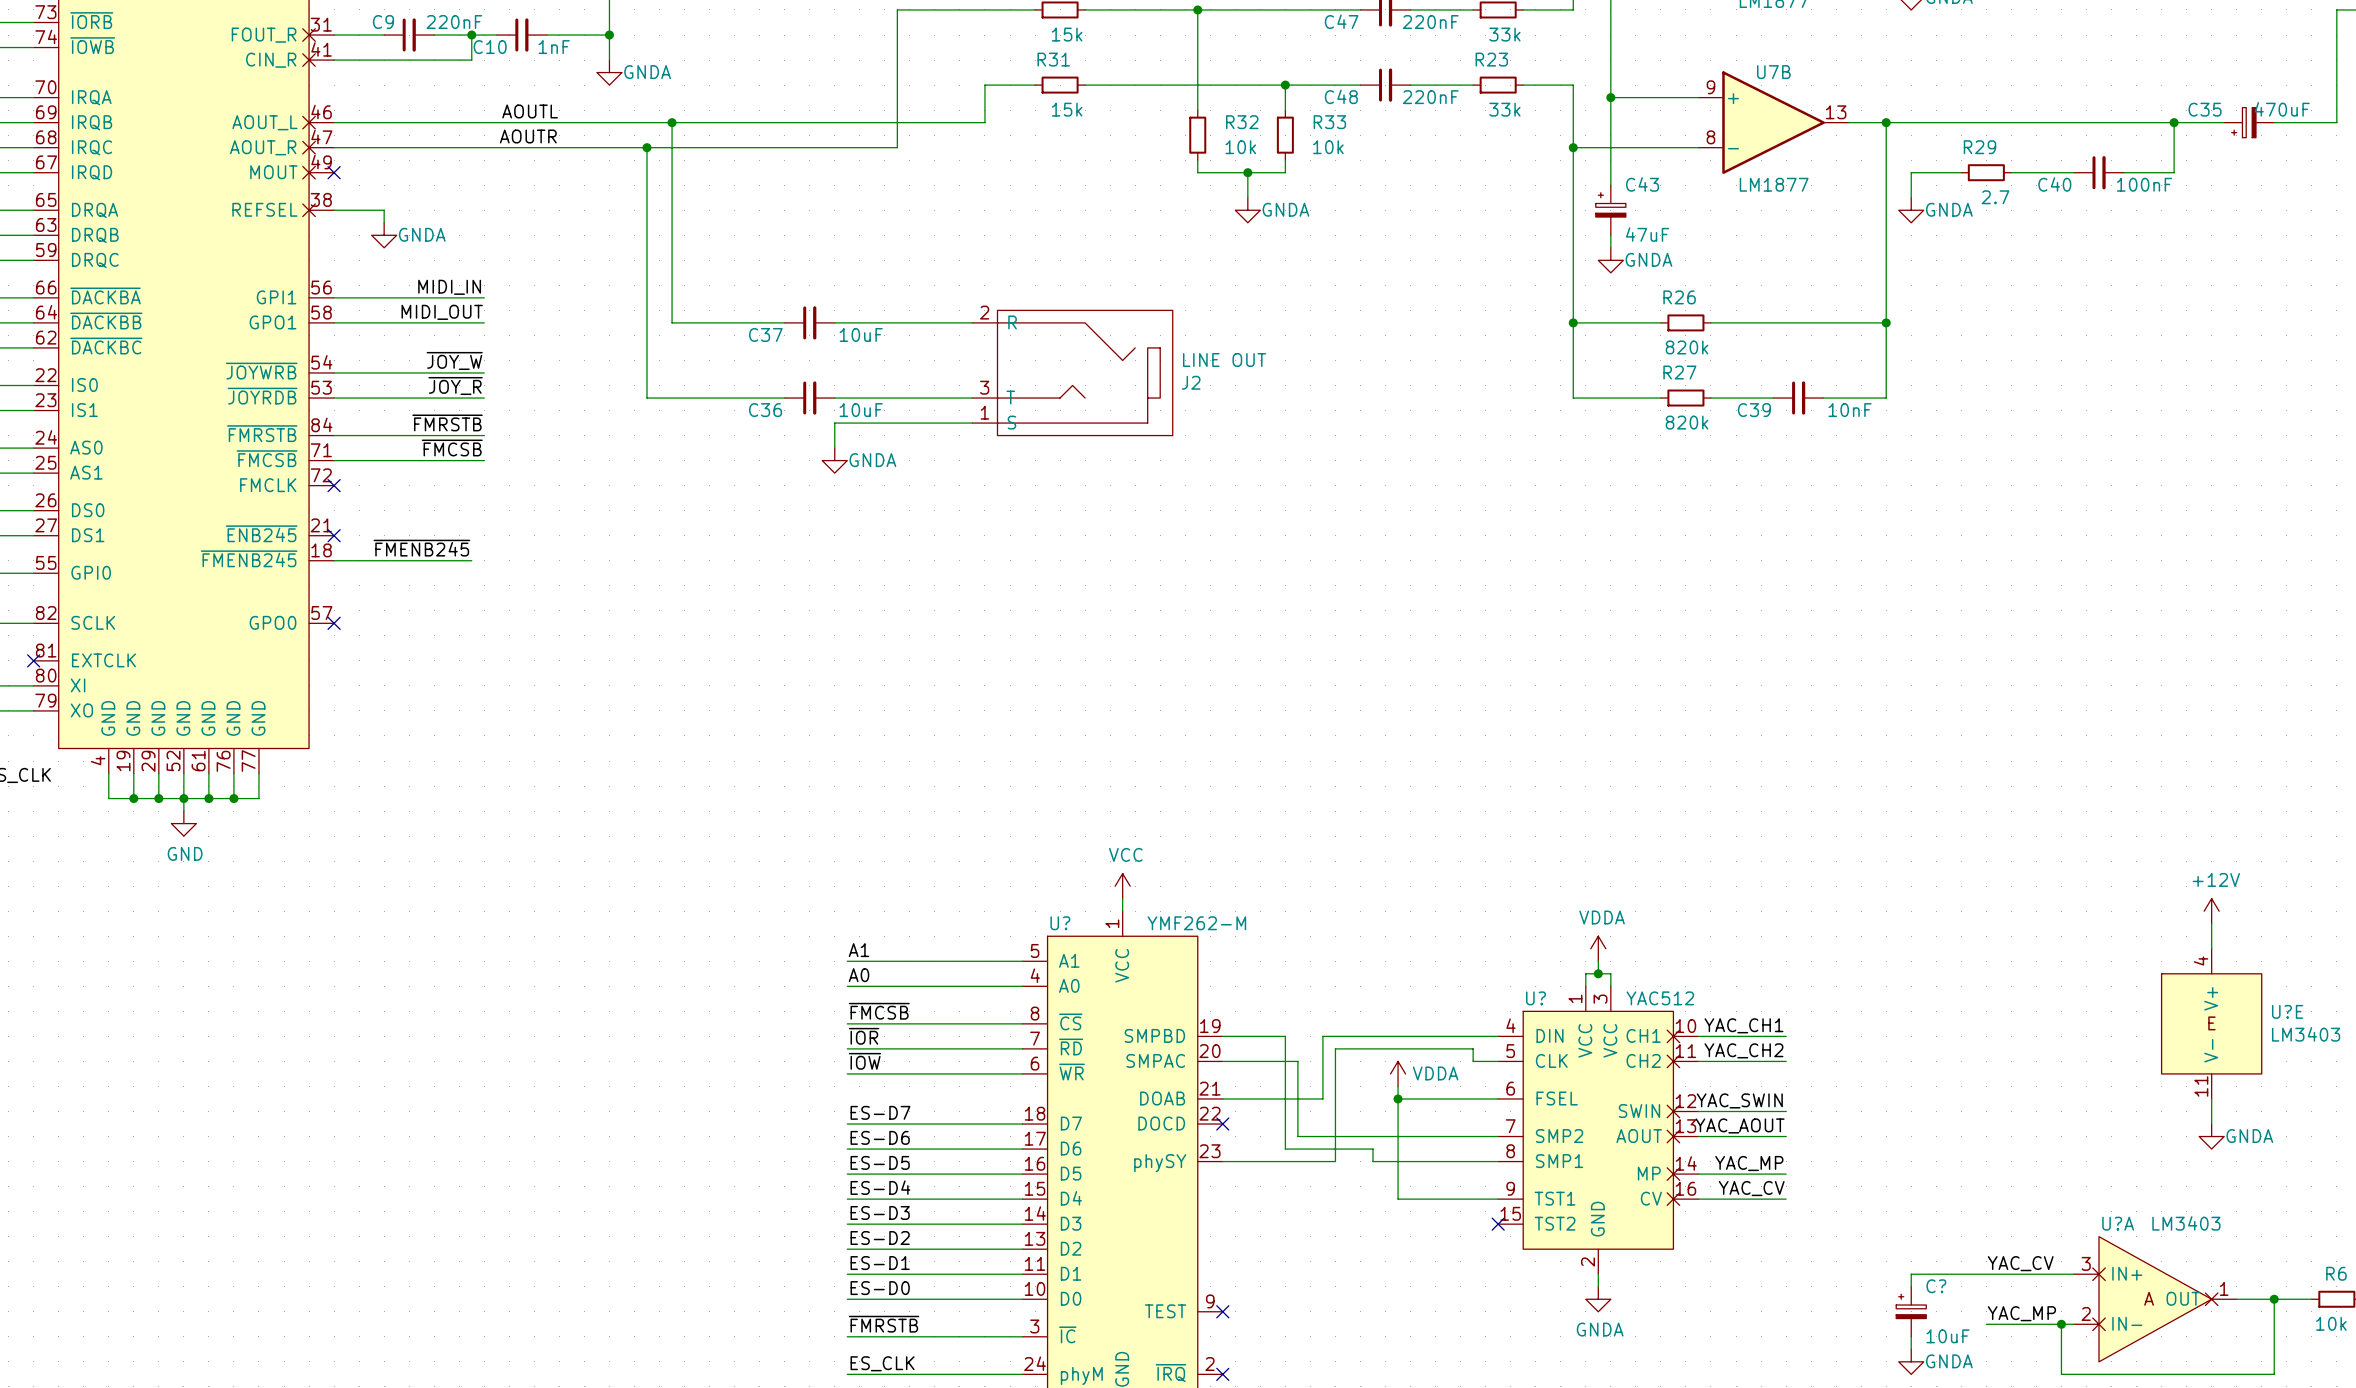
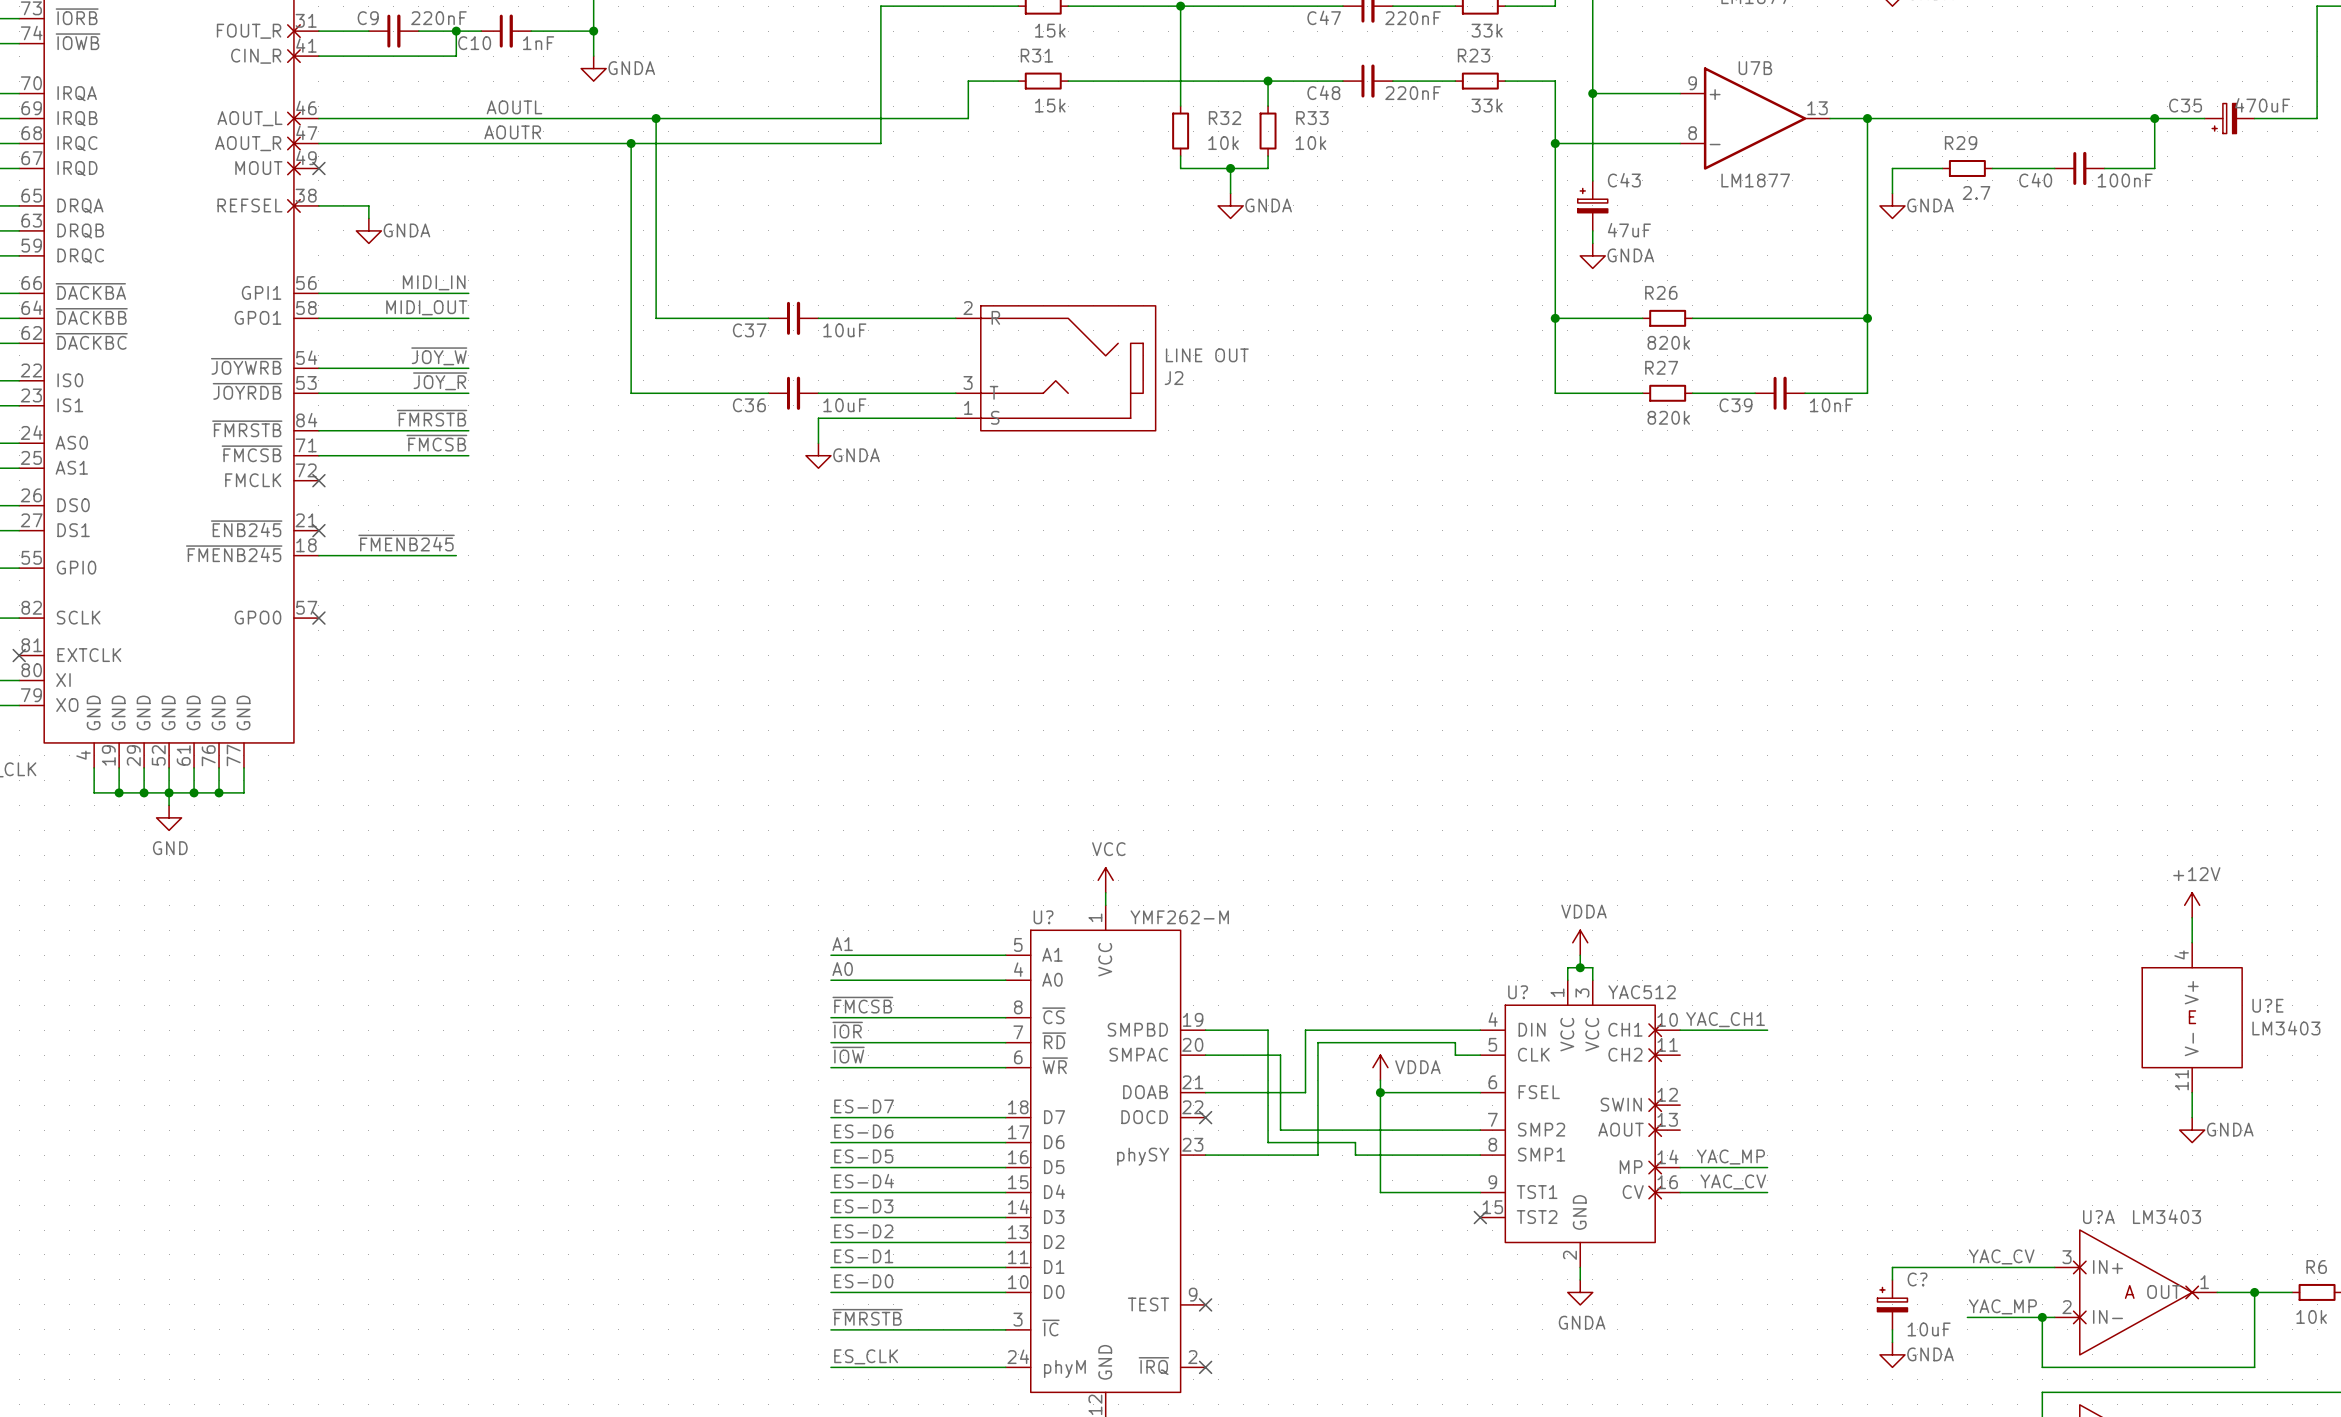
label: YAC_CH2 (1743, 1050) -> none
wire: (1698, 1061) (1786, 1061) -> none
label: YAC_SWIN (1739, 1100) -> none
wire: (1698, 1111) (1786, 1111) -> none
label: YAC_AOUT (1740, 1125) -> none
wire: (1698, 1136) (1786, 1136) -> none

